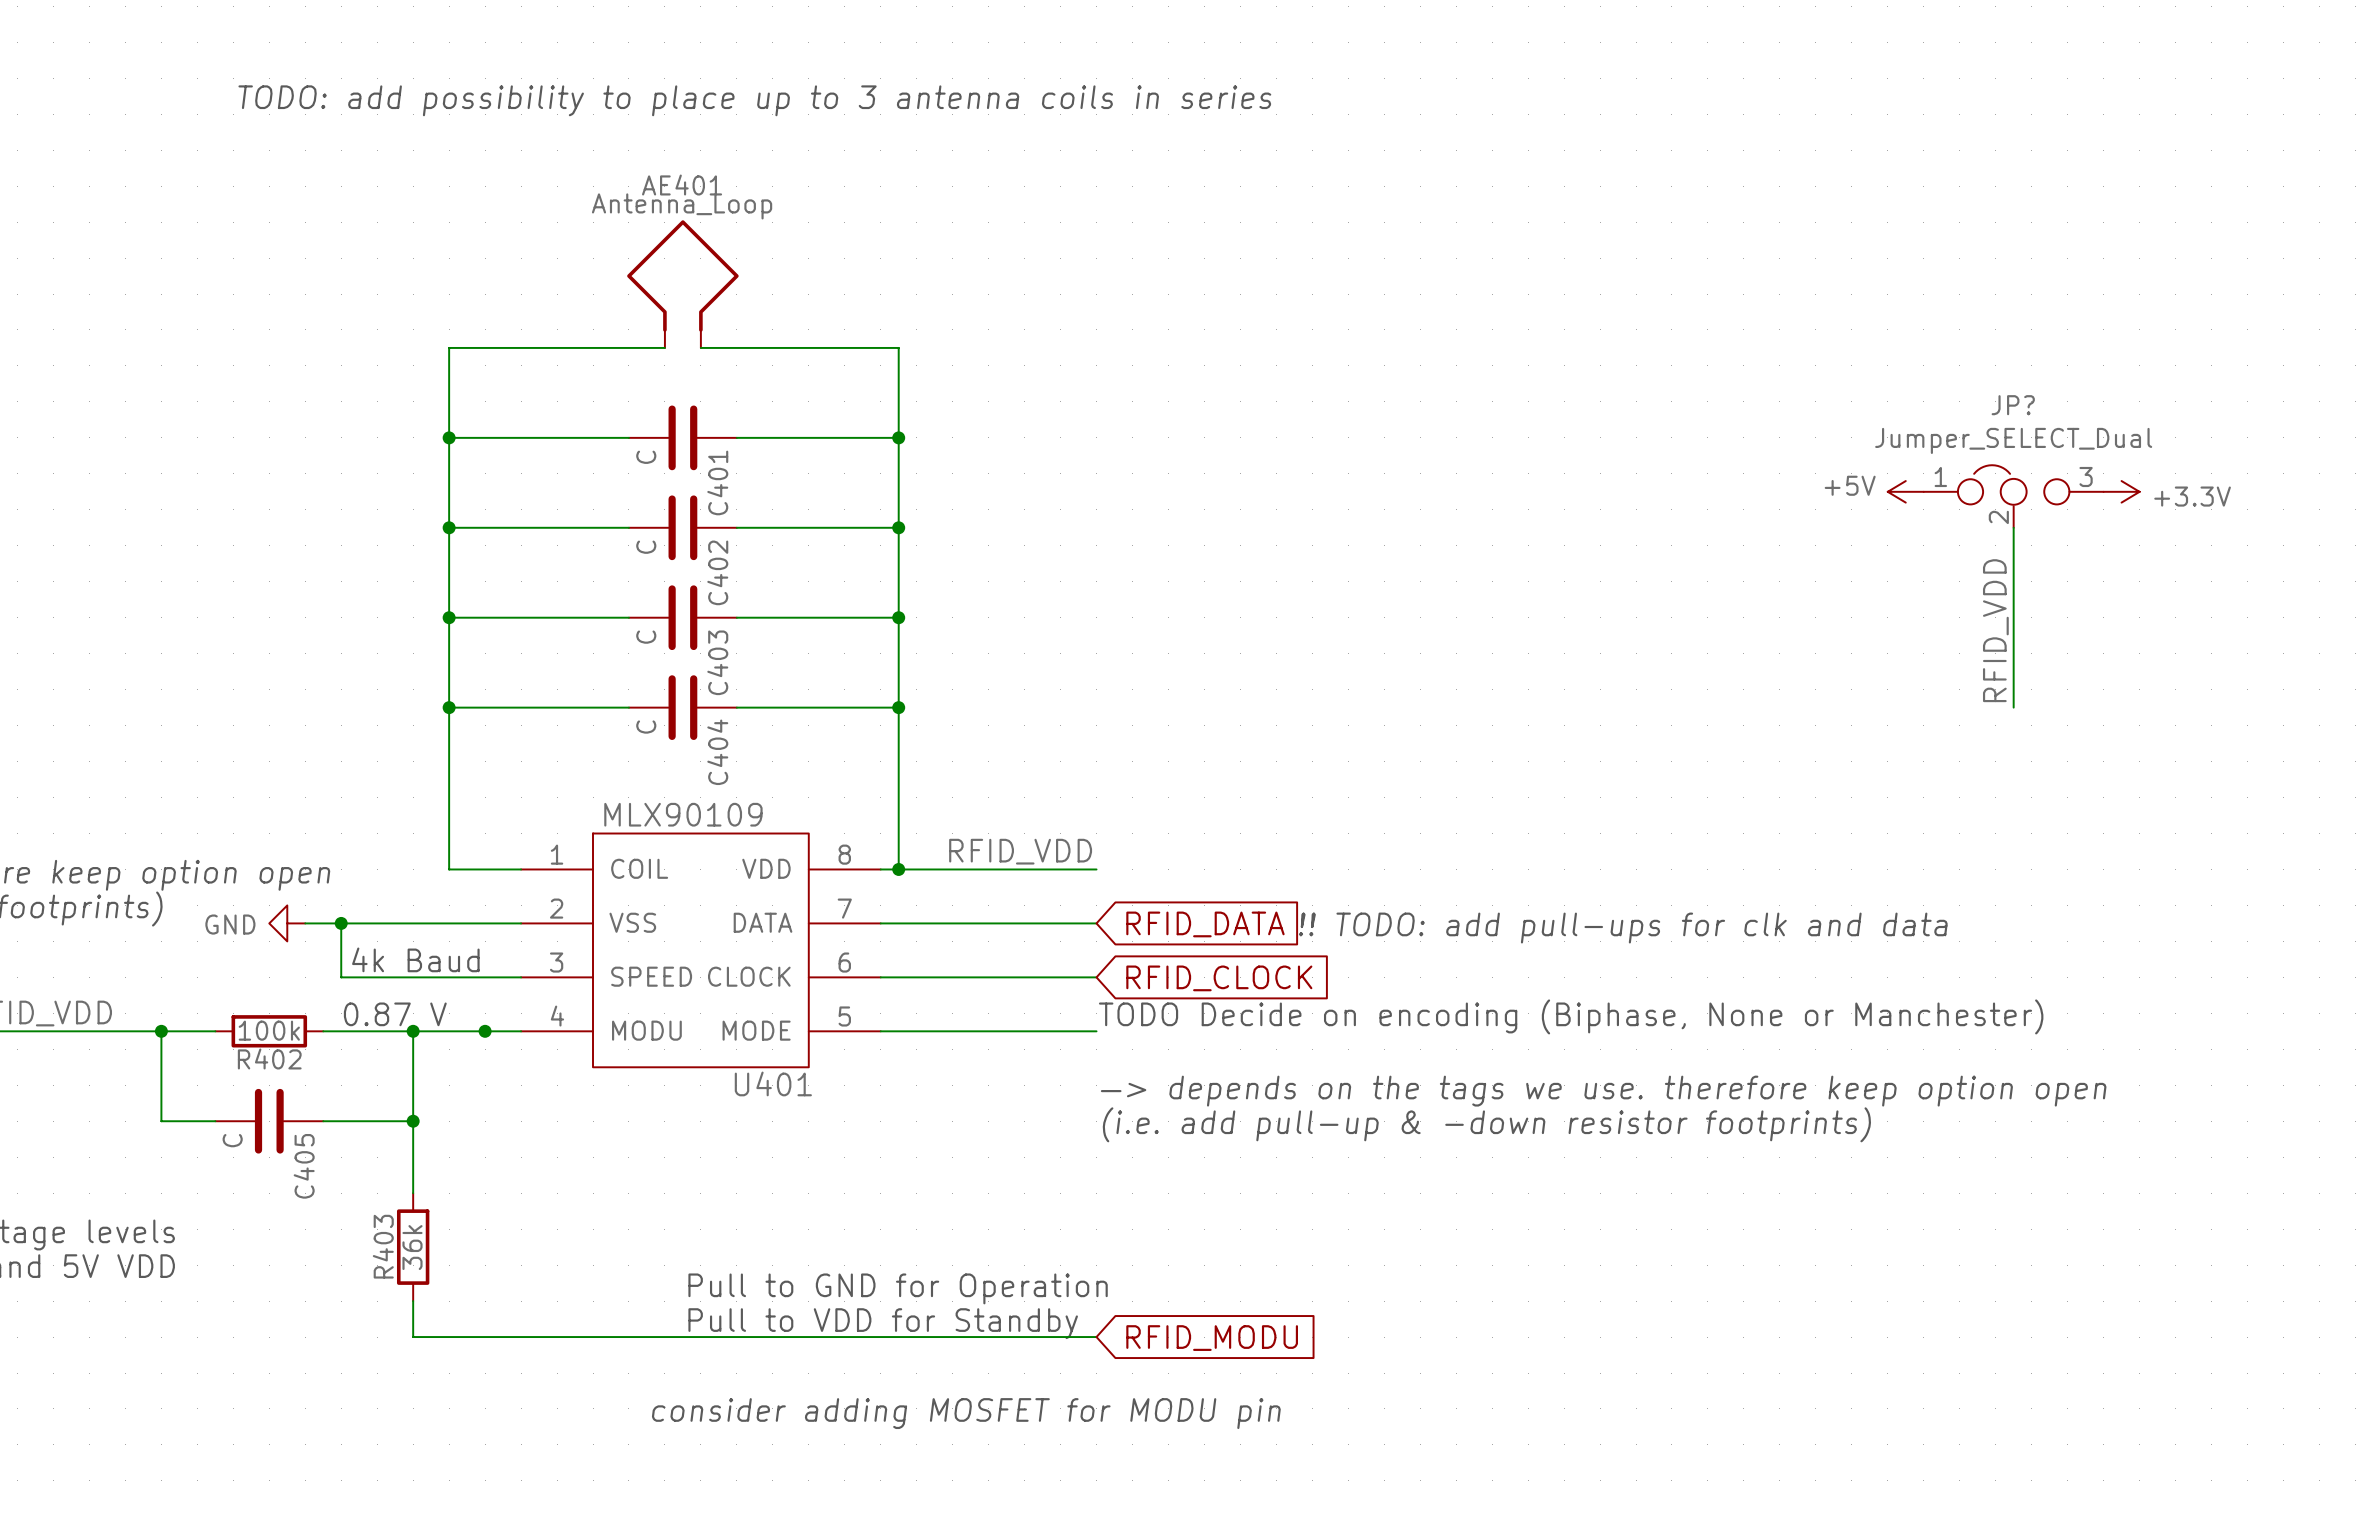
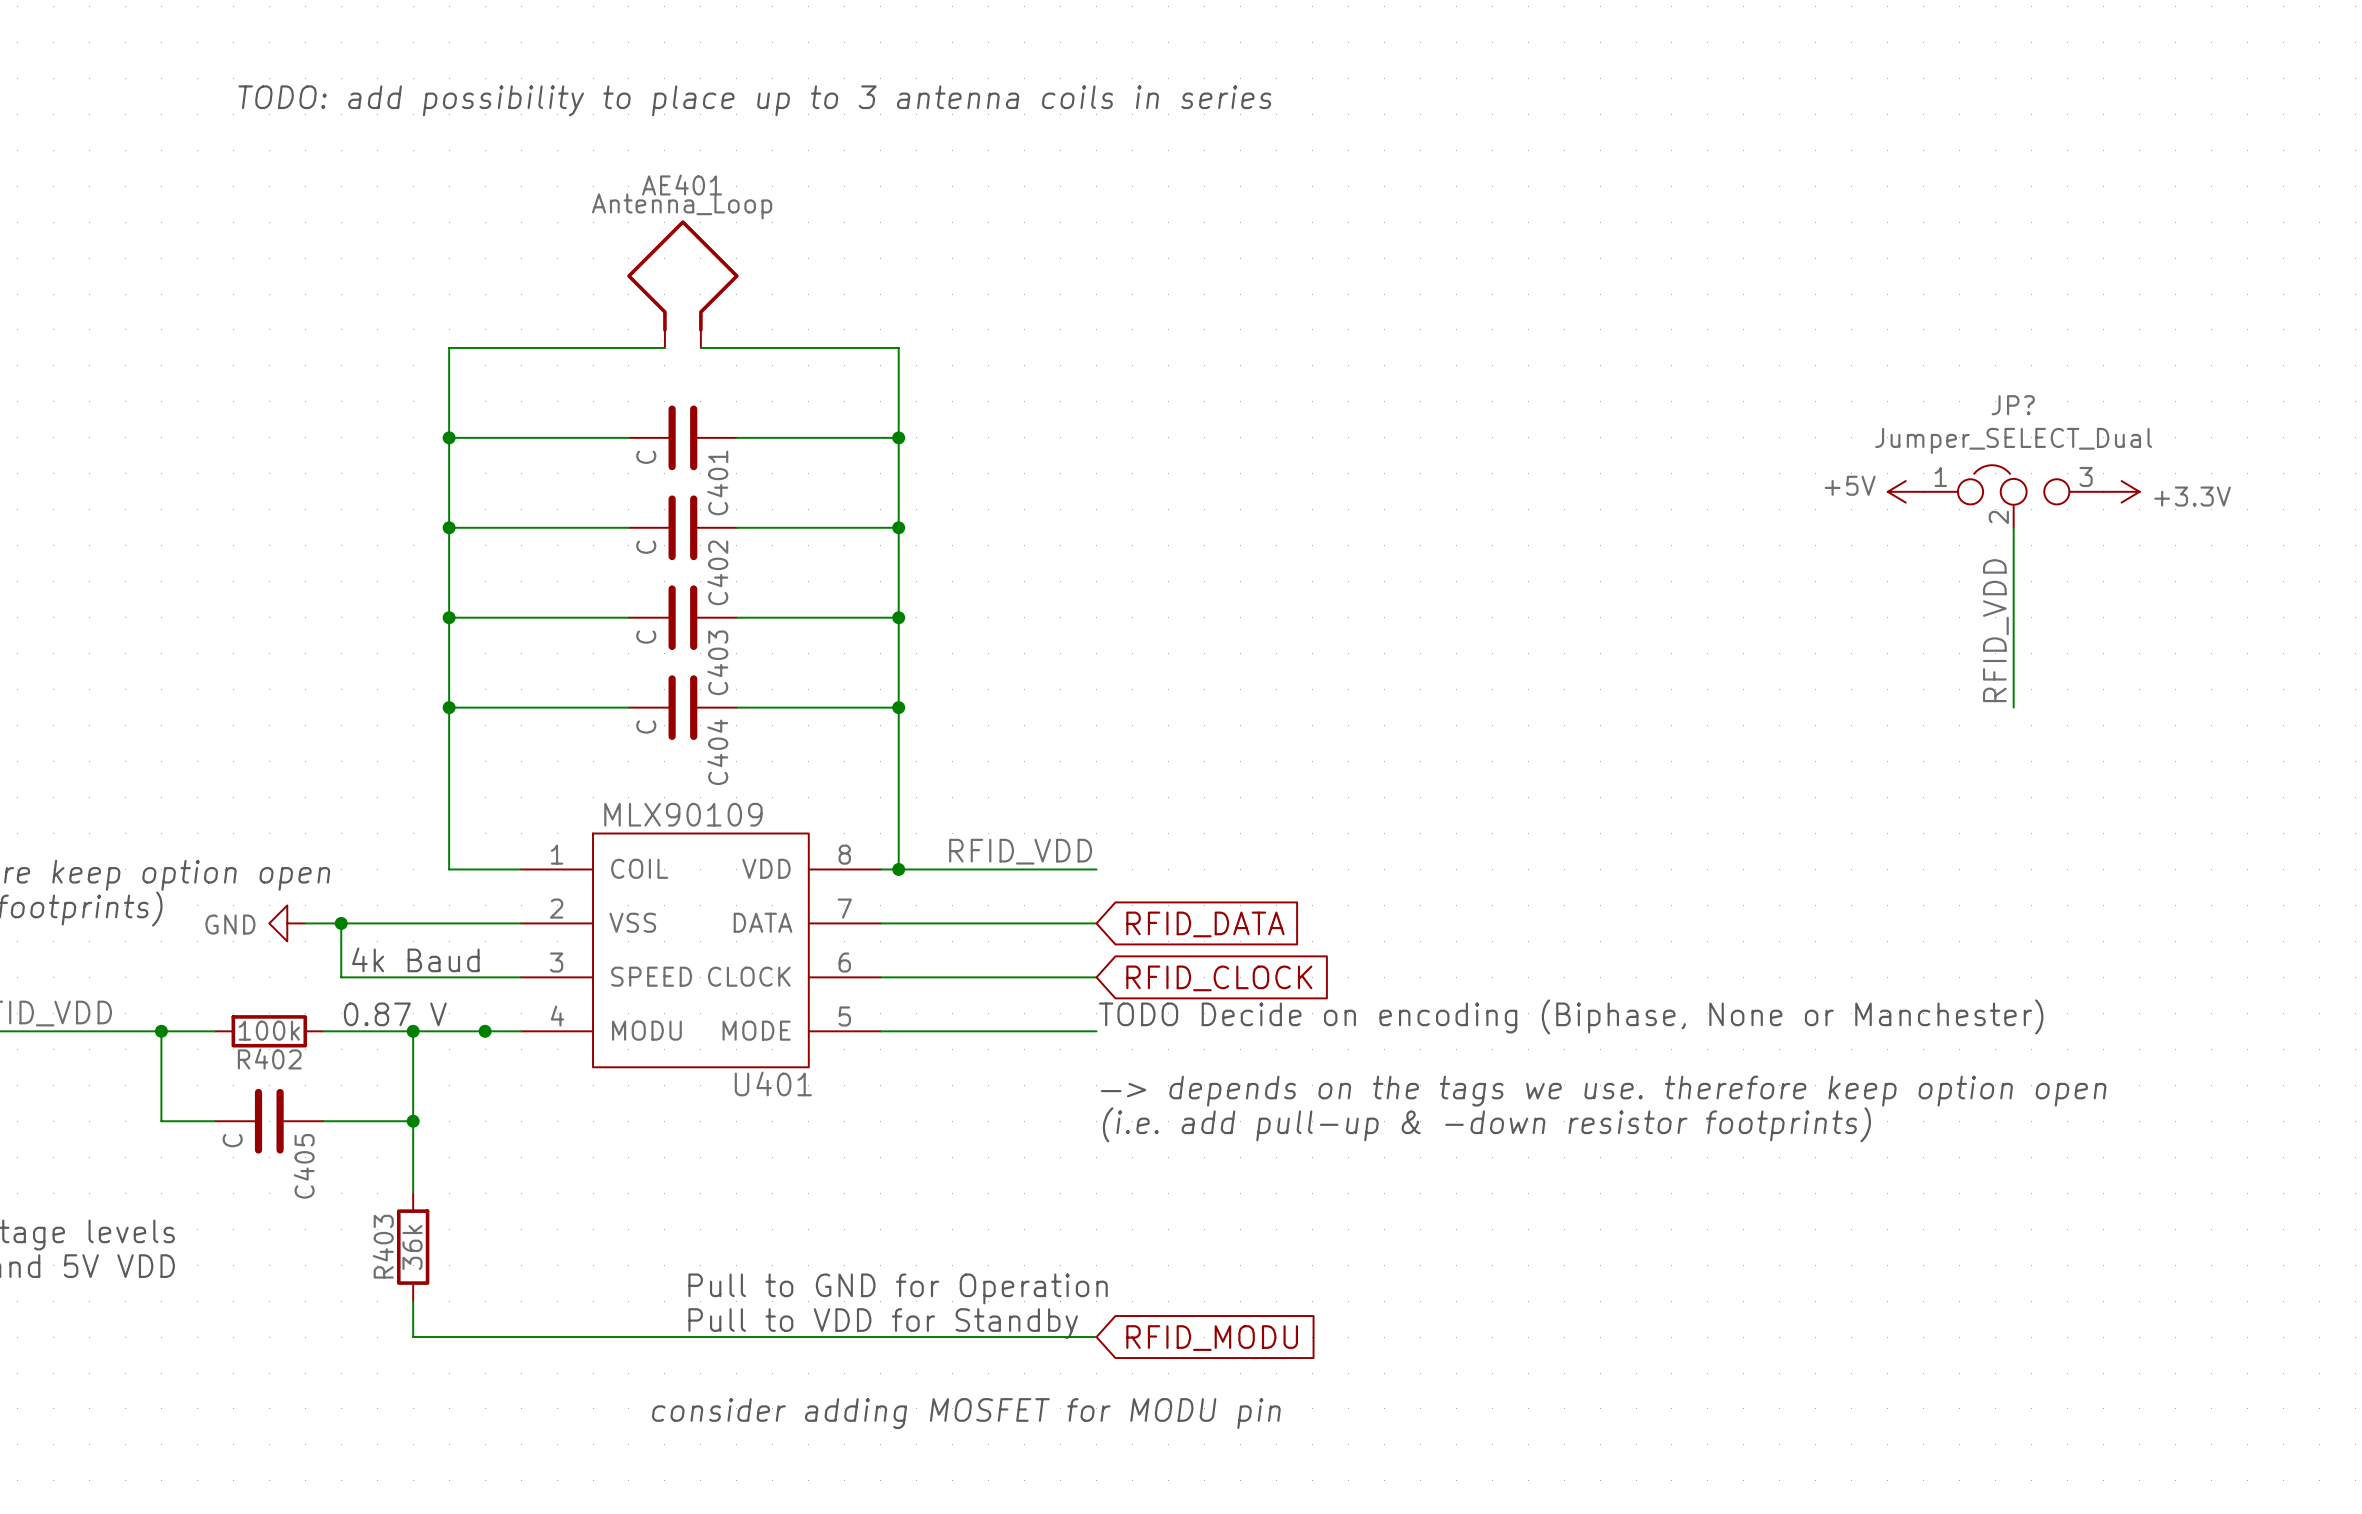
text: !! TODO: add pull-ups for clk and data (1623, 928) -> none

